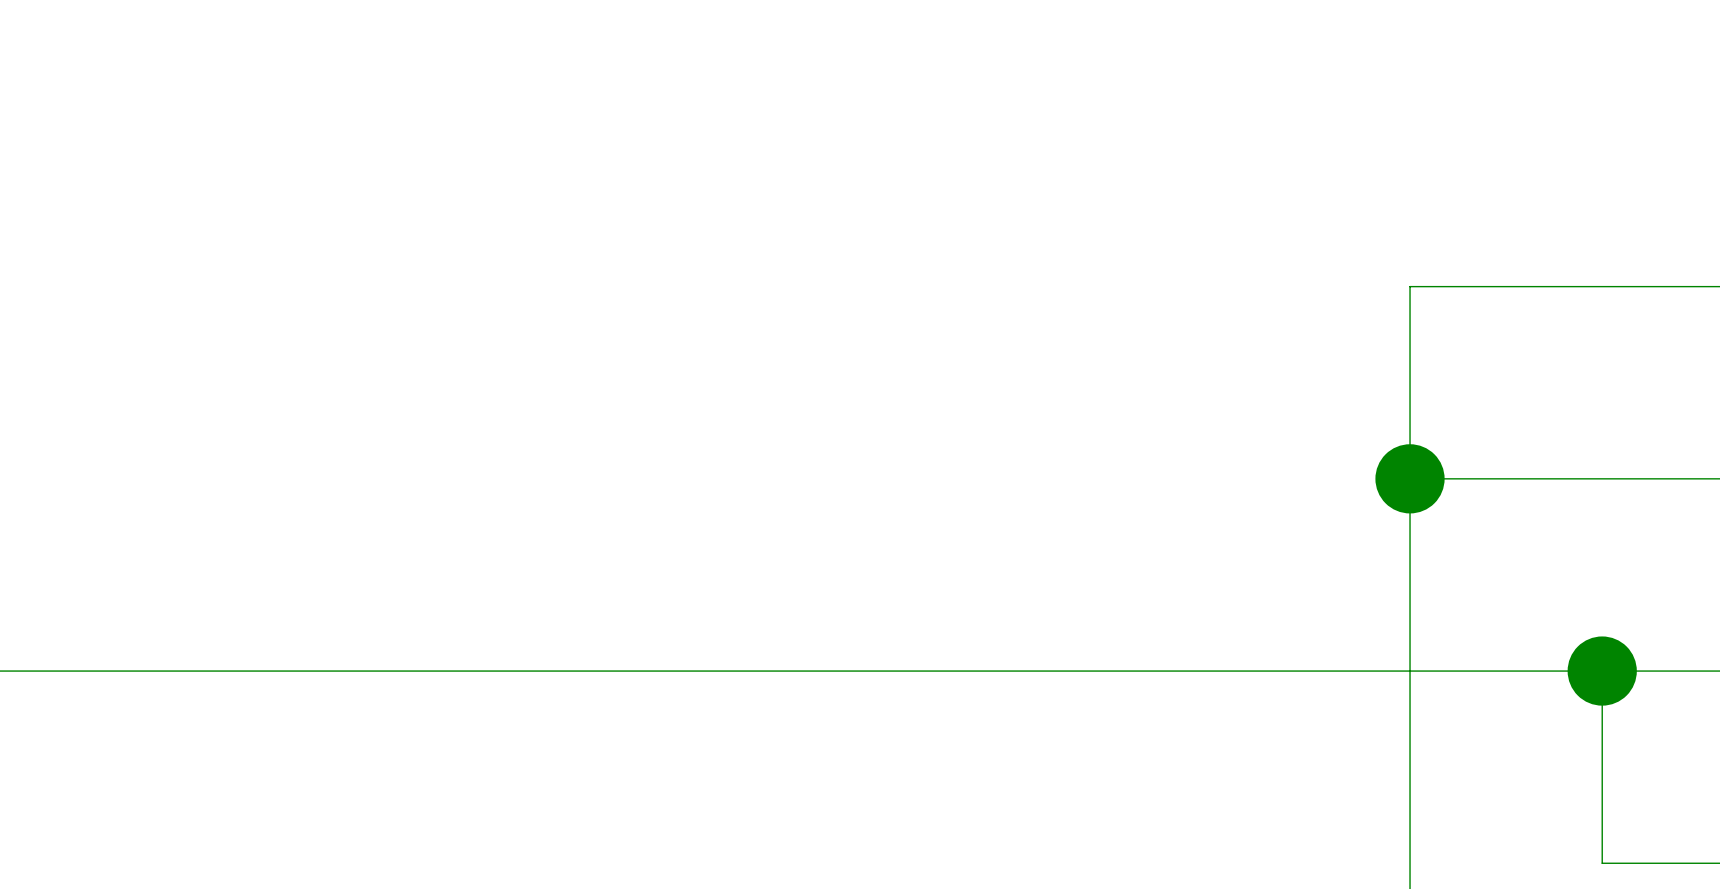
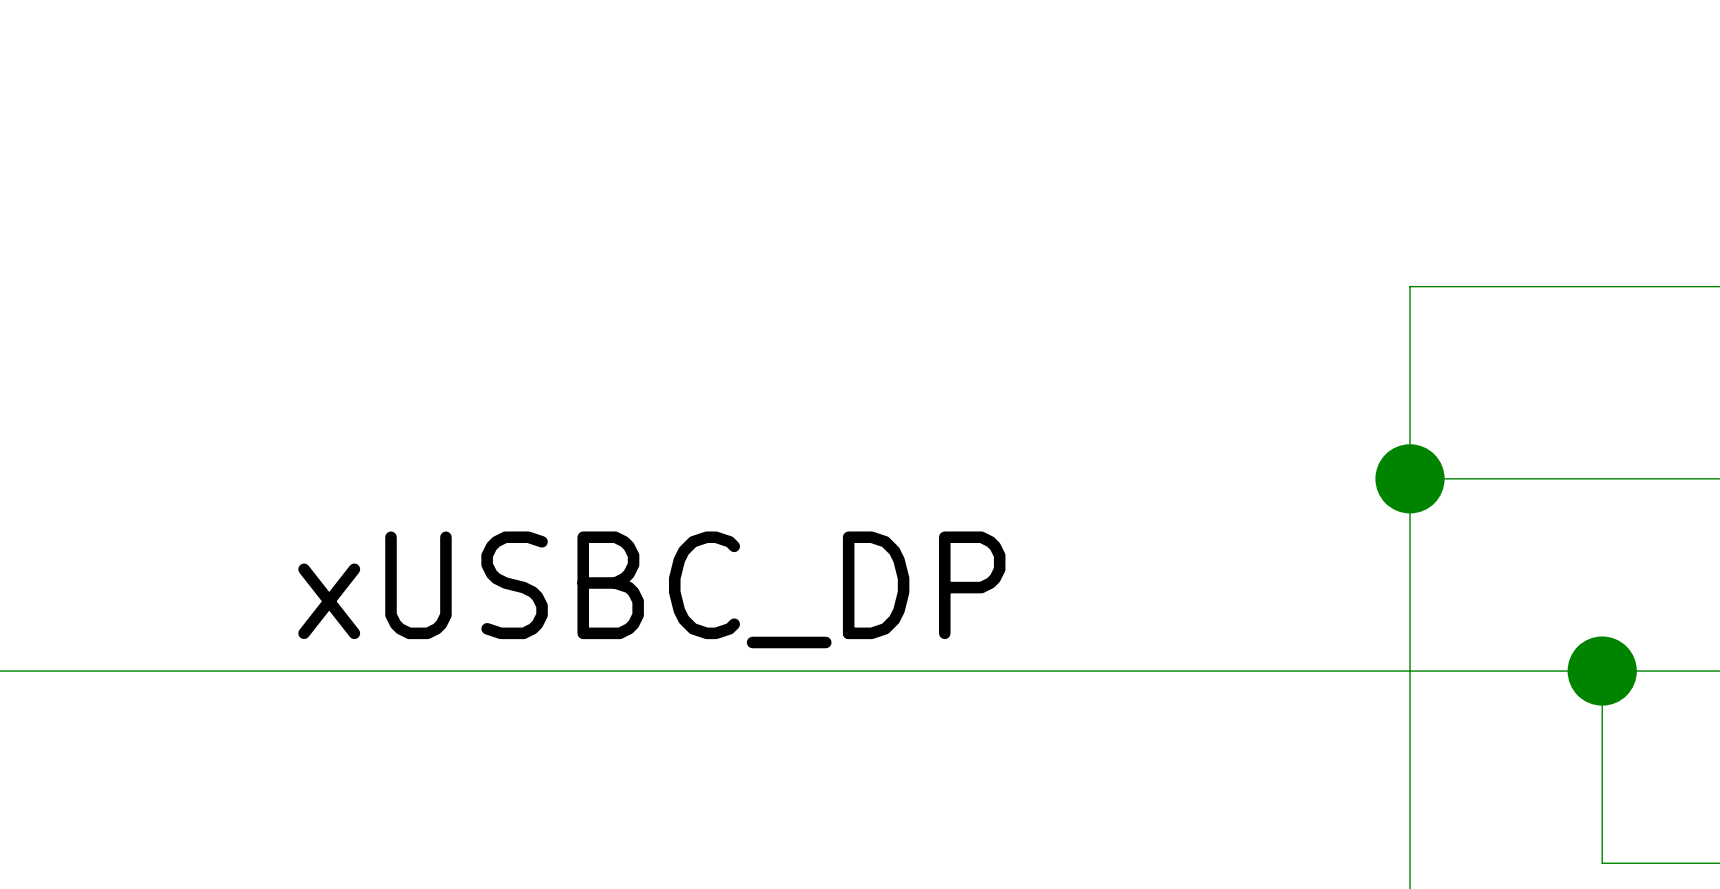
label: none -> xUSBC_DP (651, 589)

